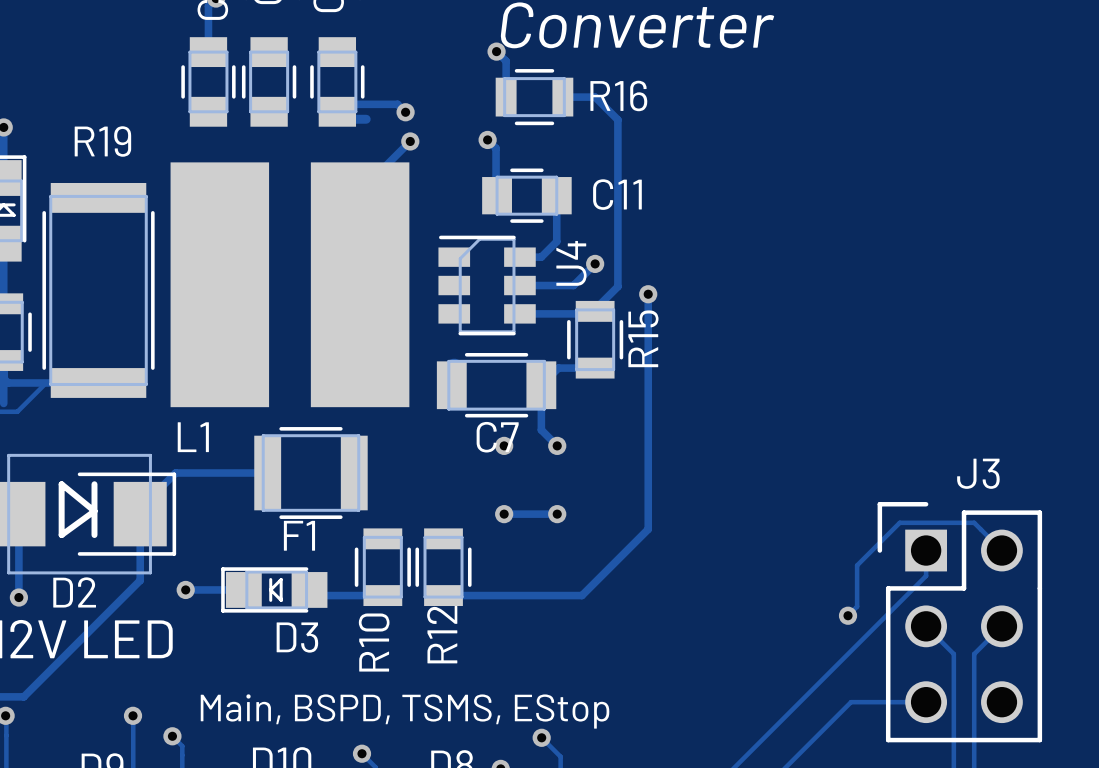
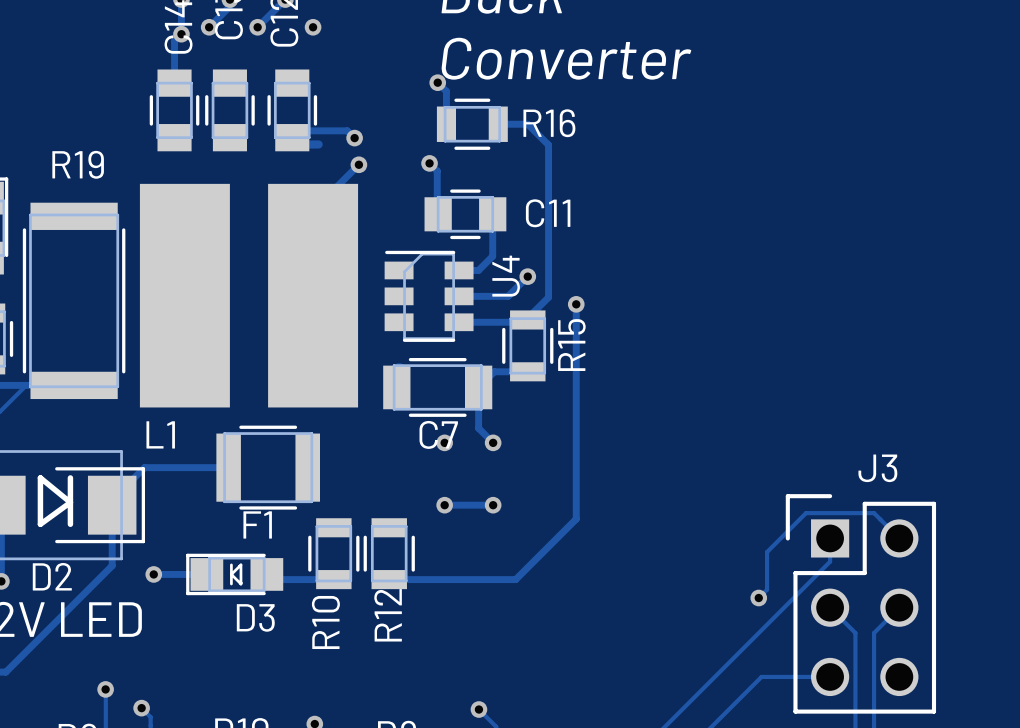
text: Main, BSPD, TSMS, EStop (405, 711) -> none

